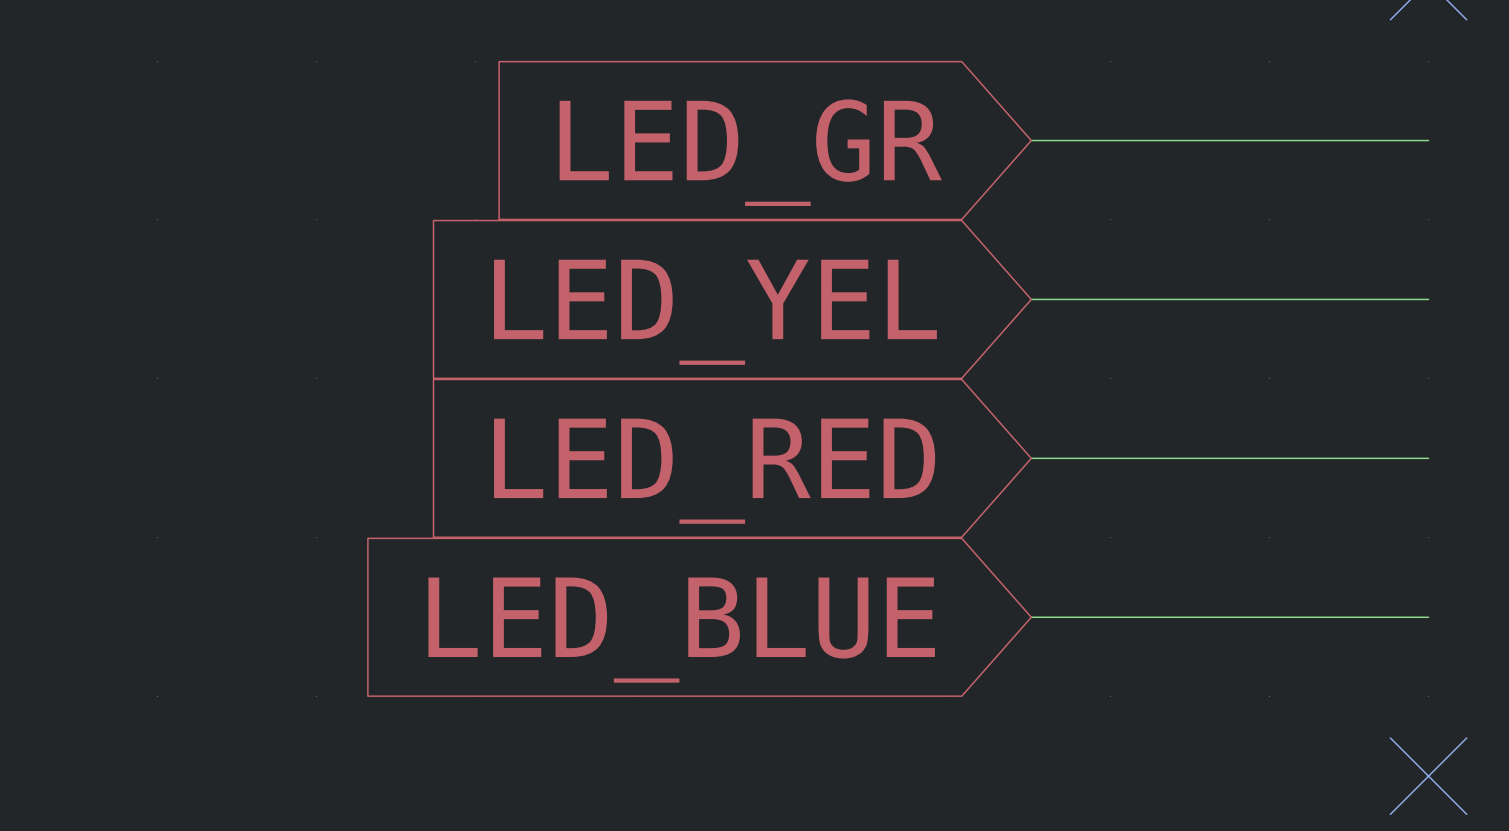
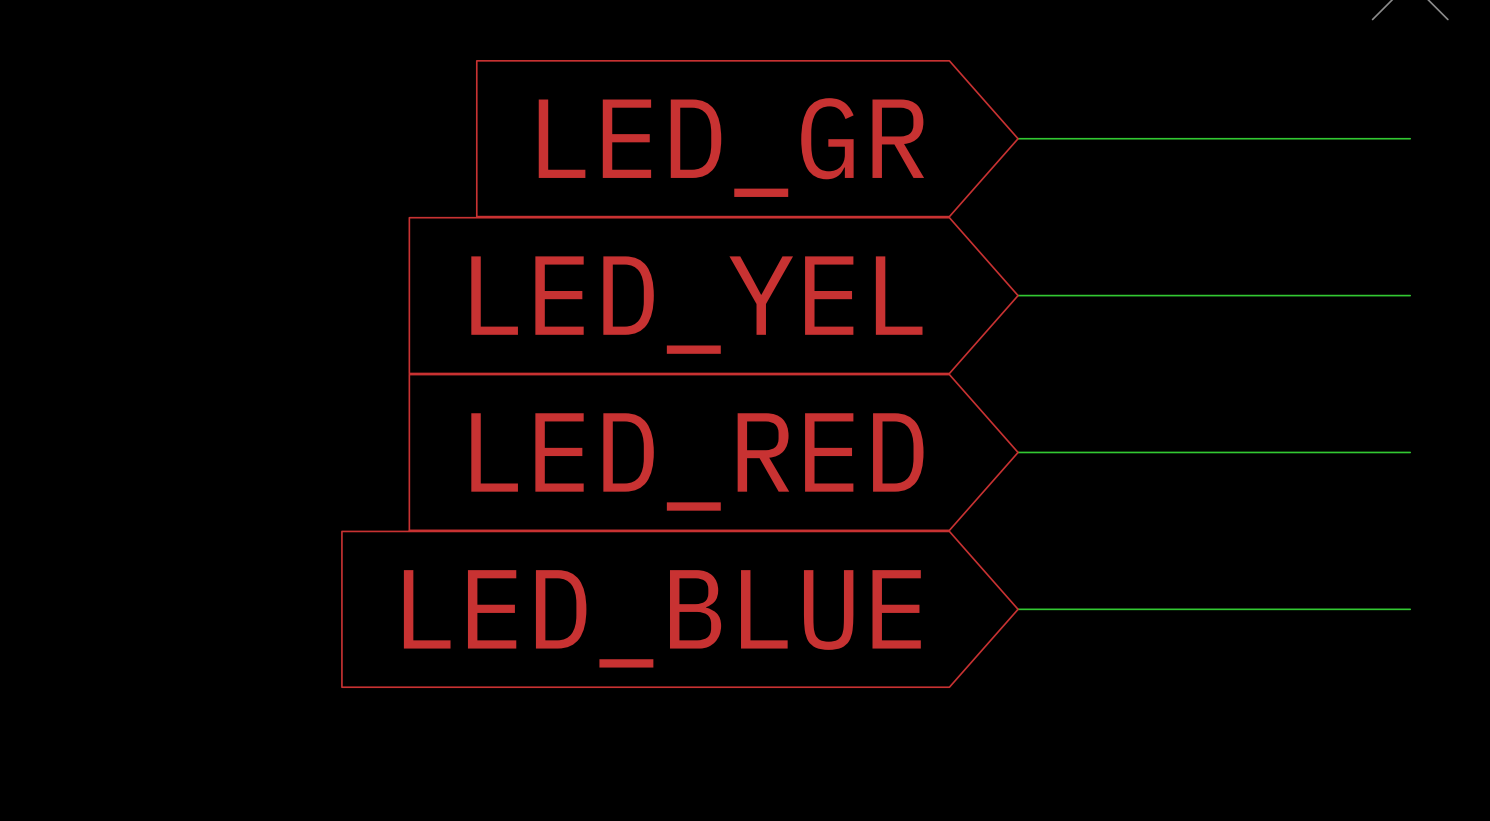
no-connect mark: (1428, 776) -> none

